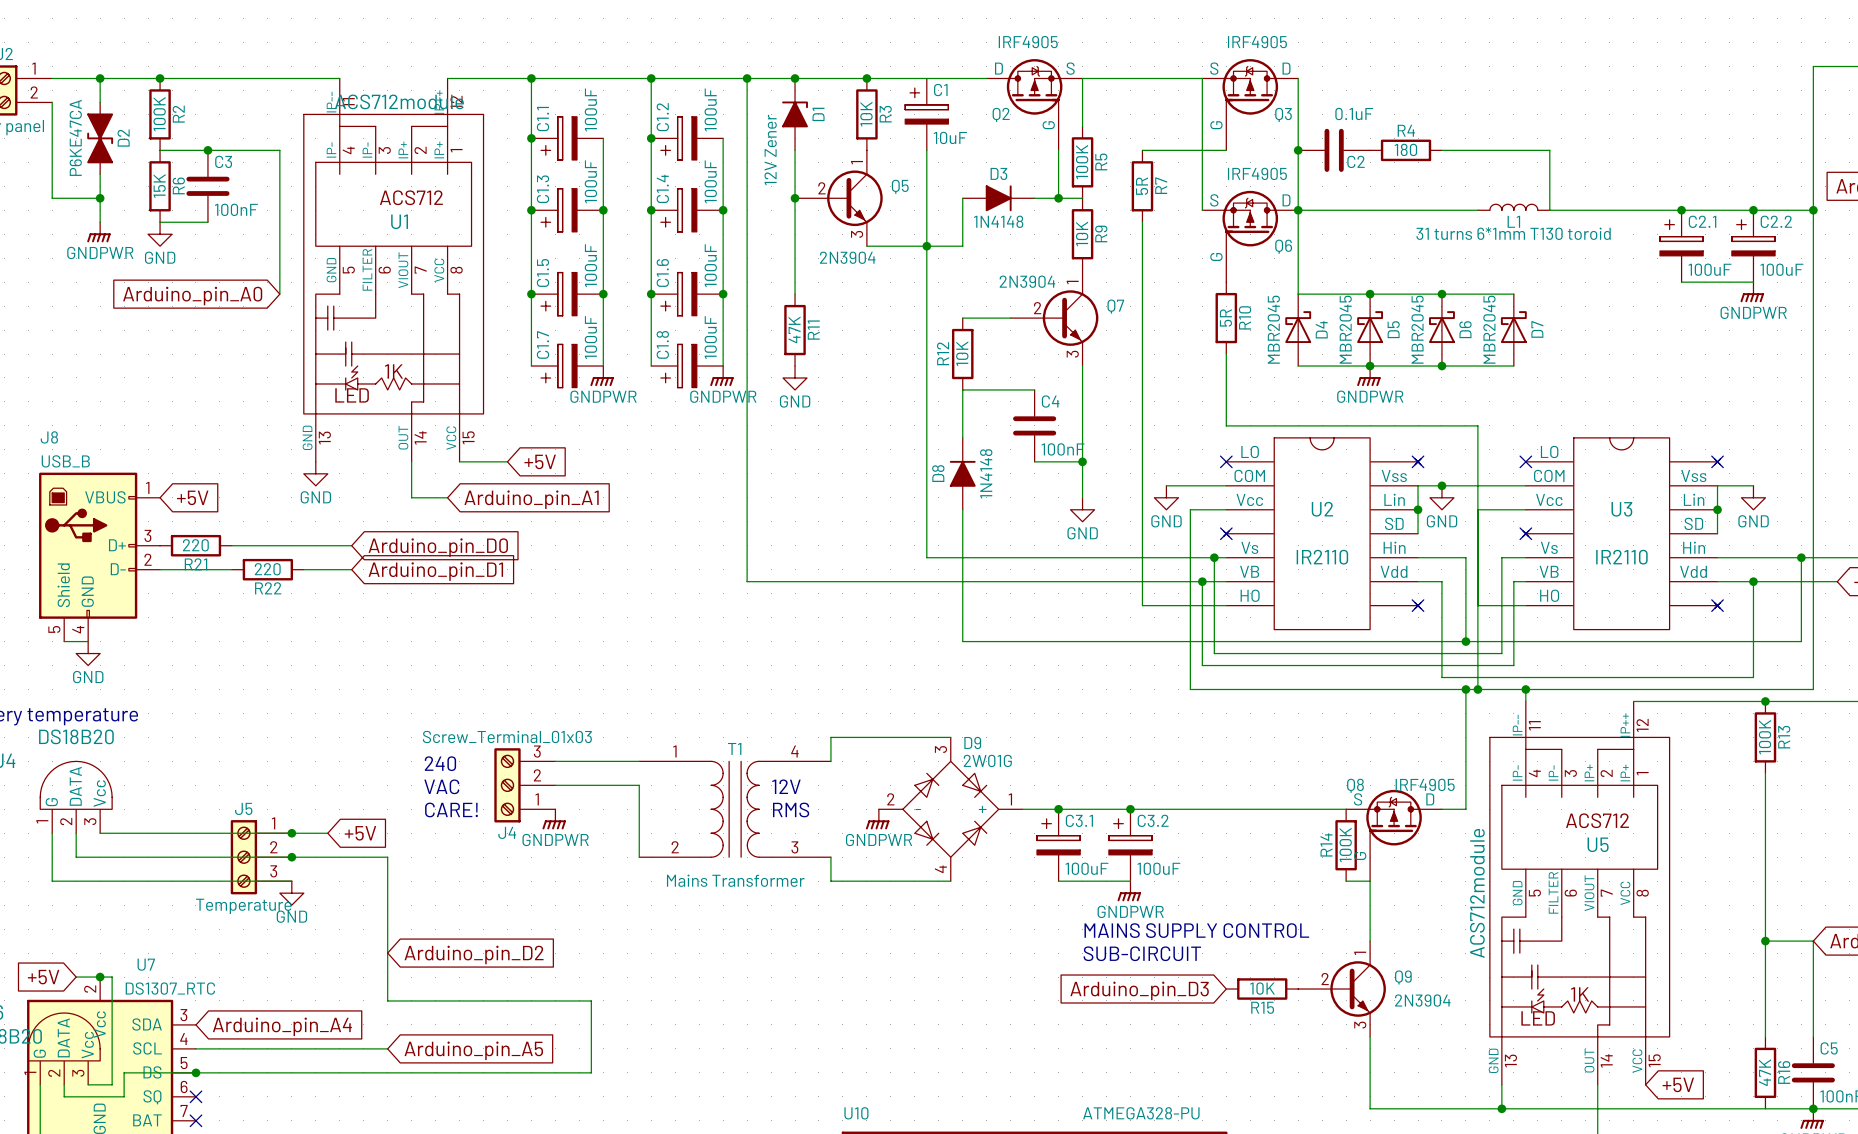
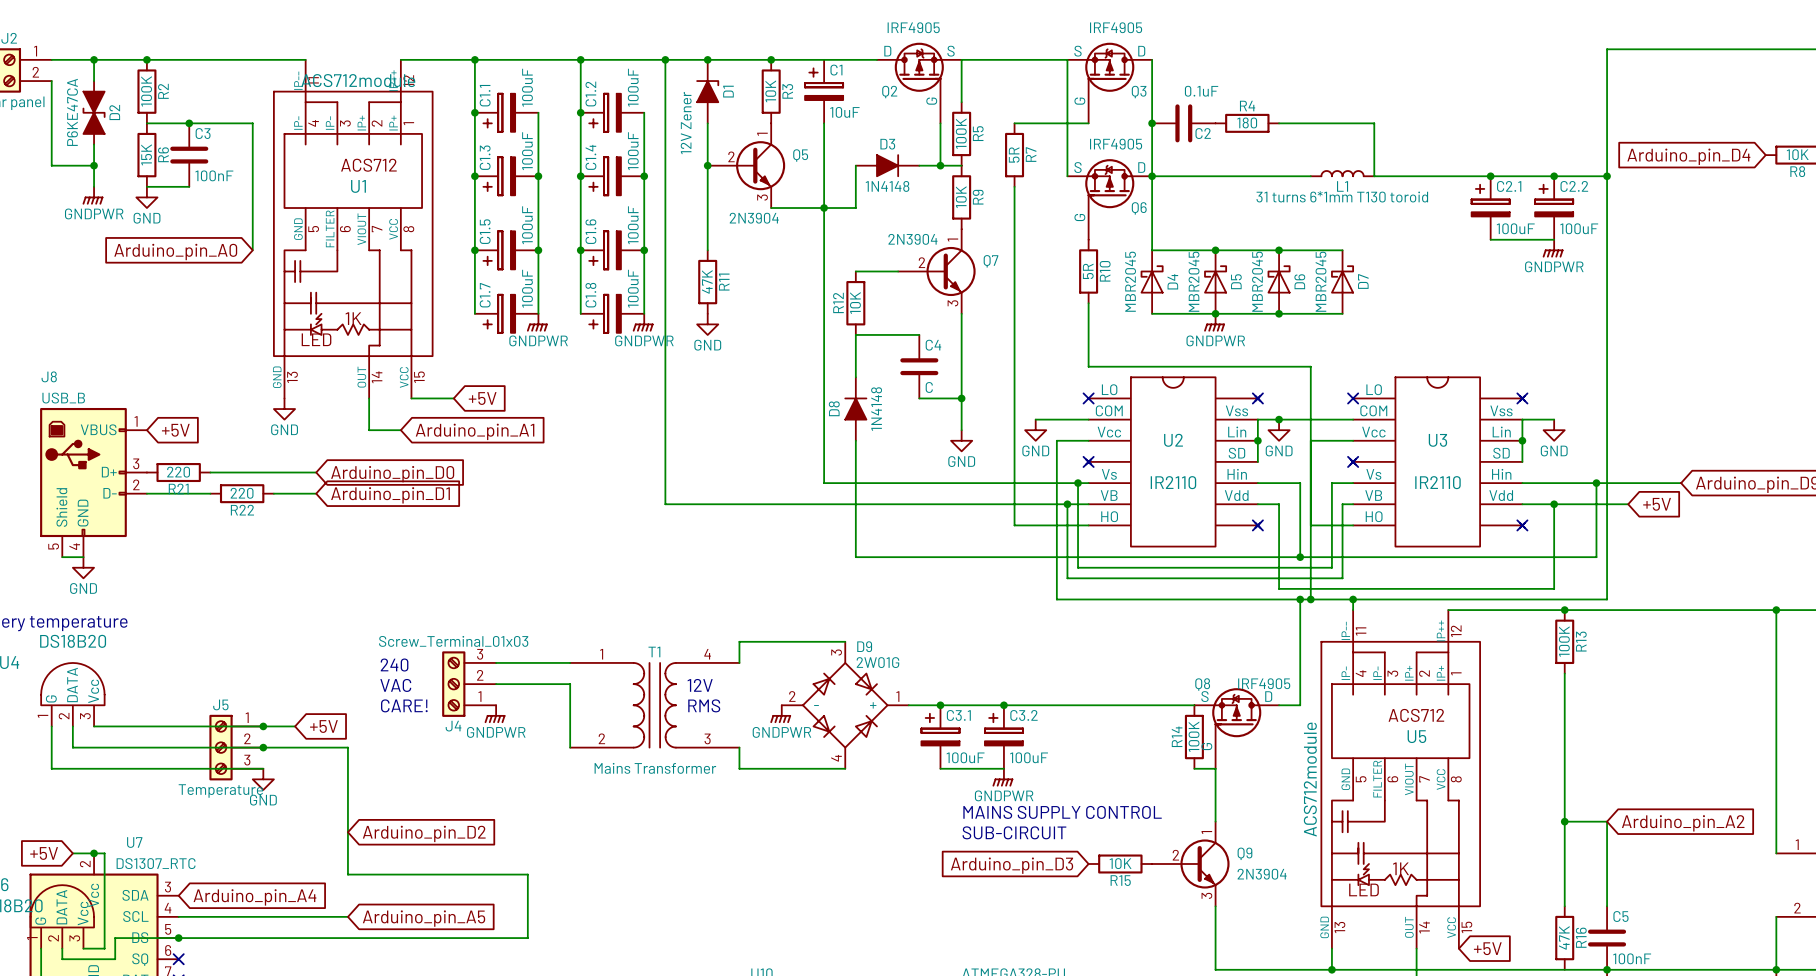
C4 value: 100nF (1063, 449) -> C (929, 387)

